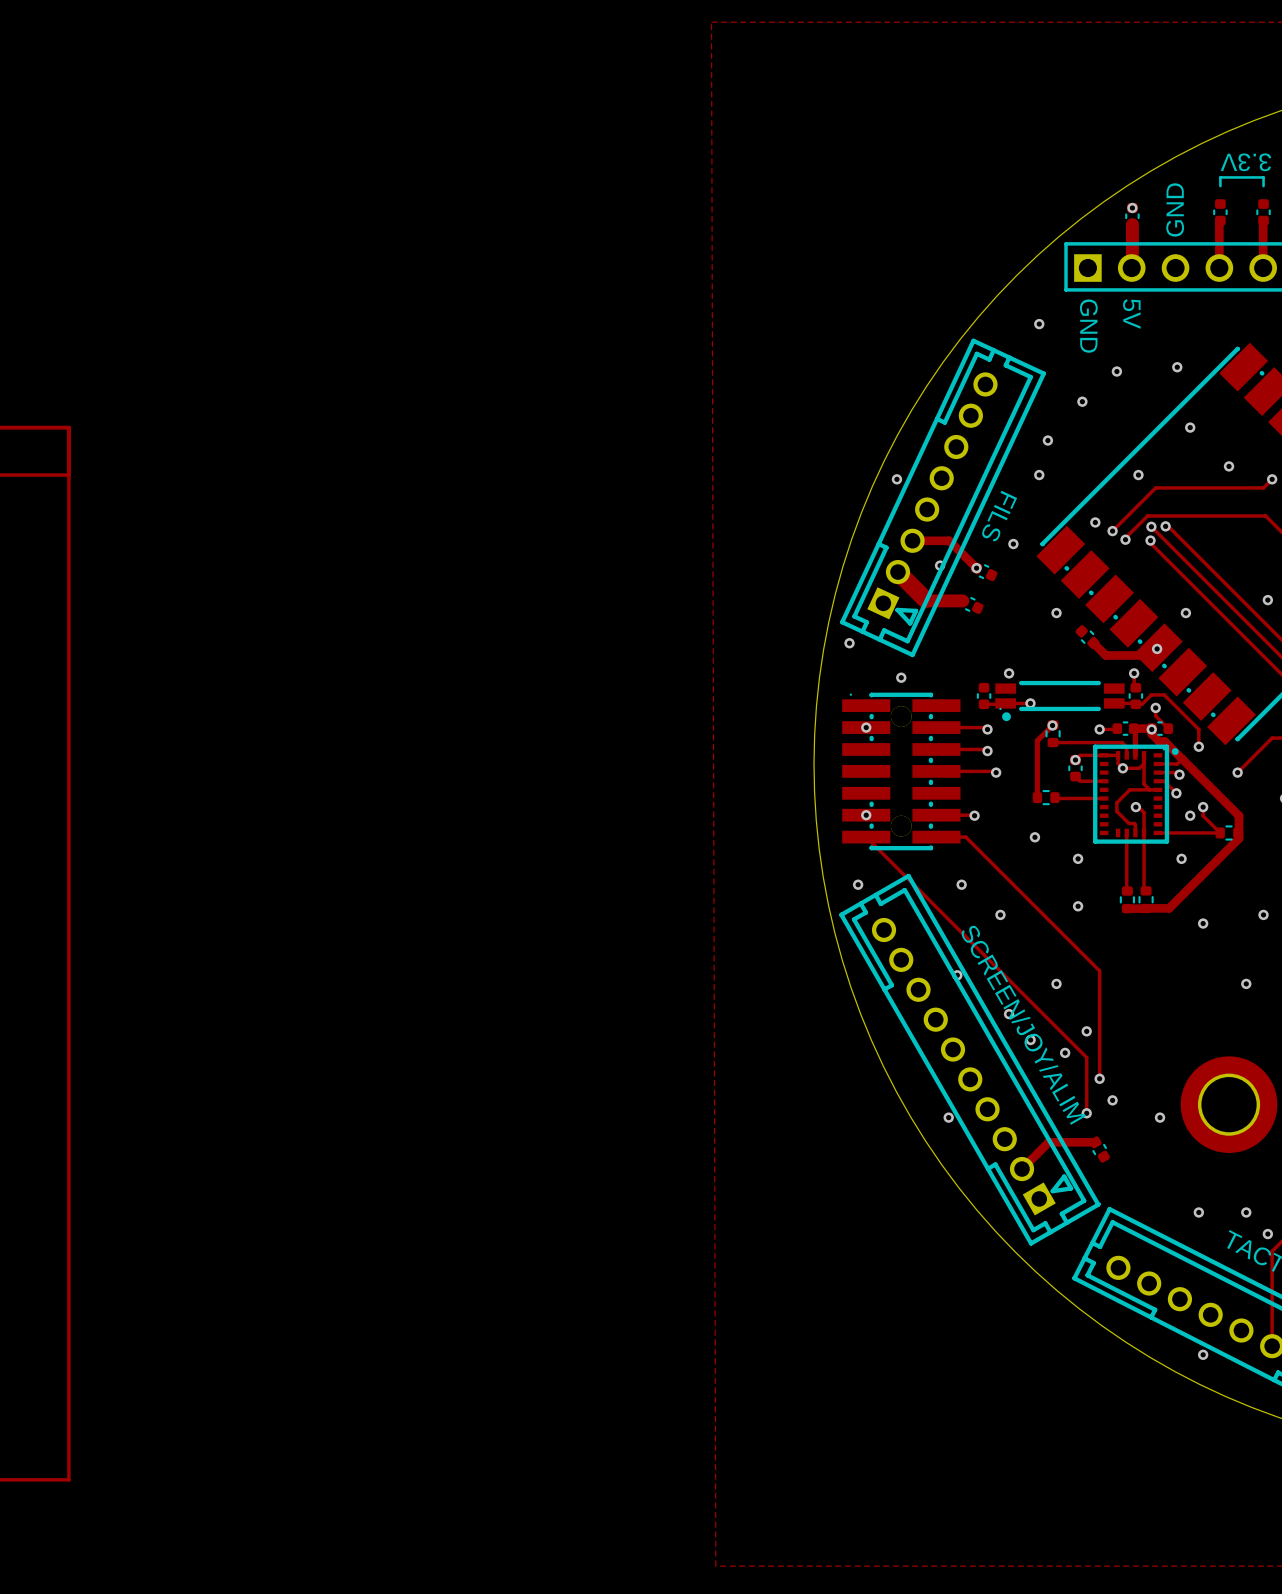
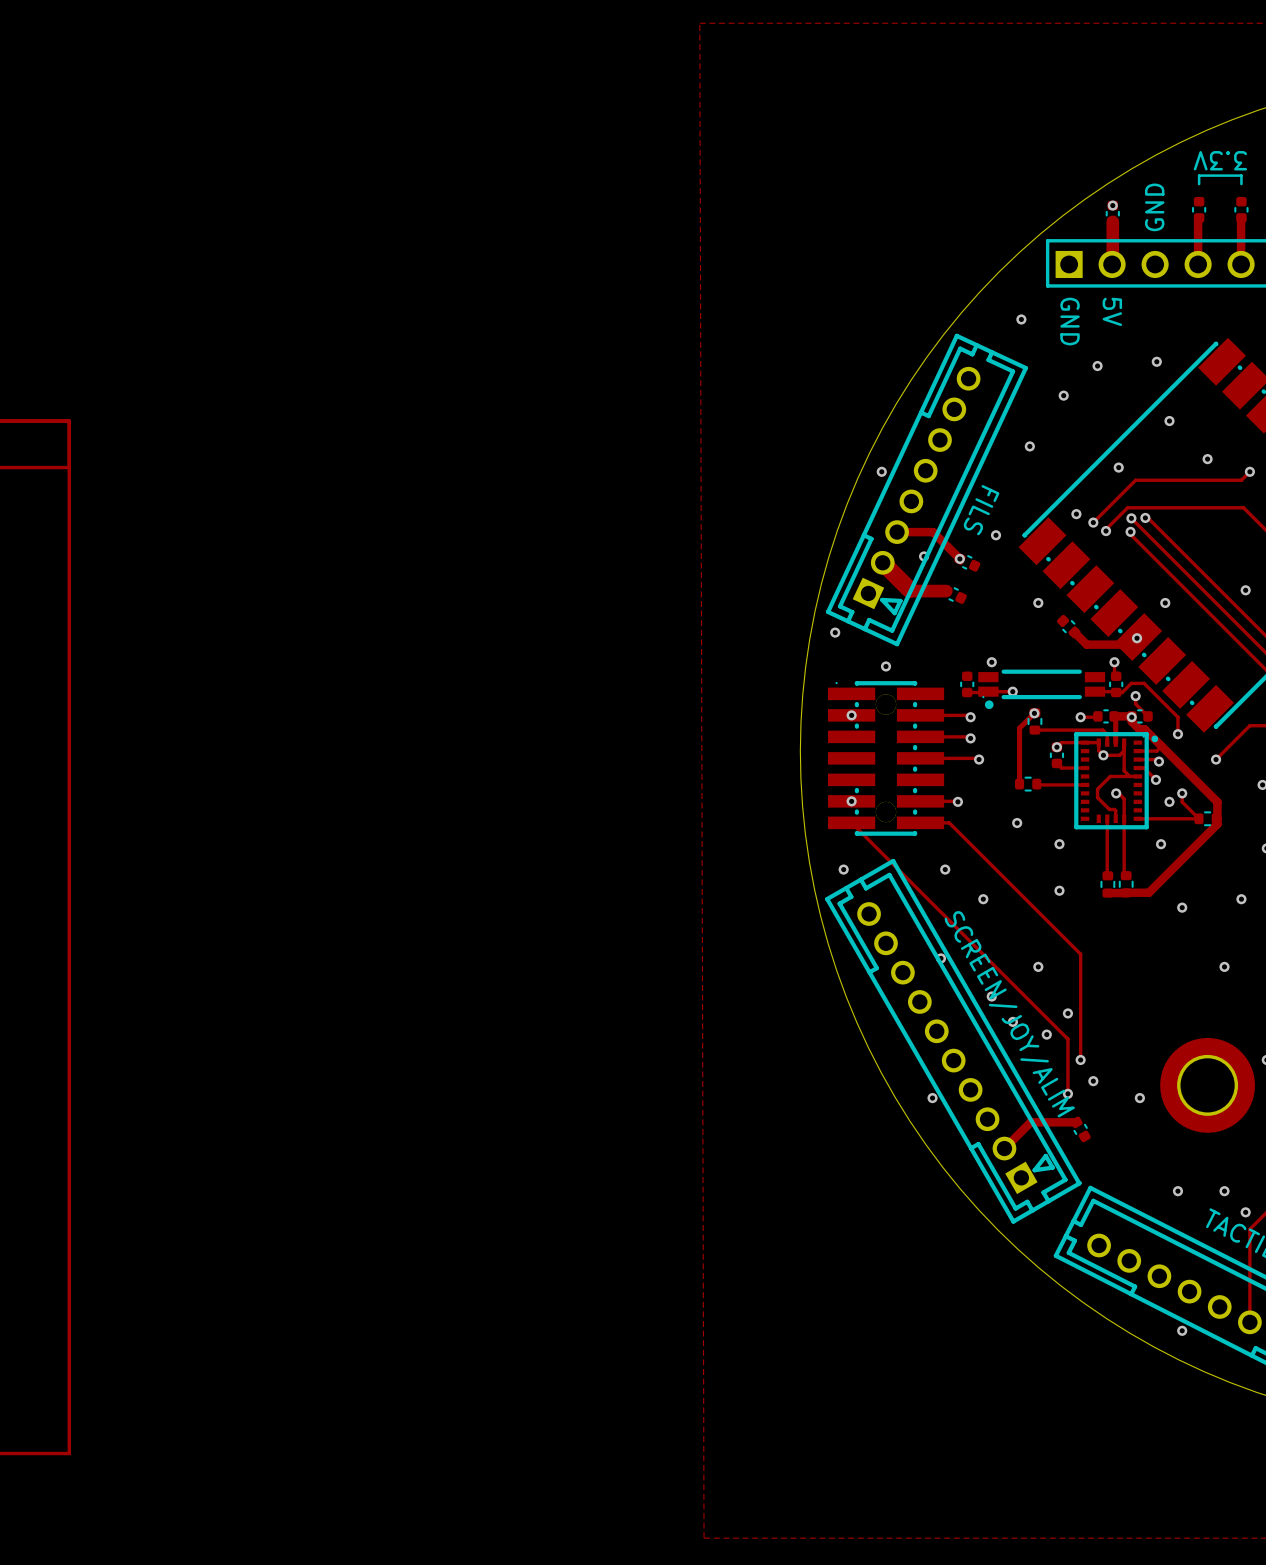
via: (1047, 440) -> none
via: none -> (1029, 446)
via: (1039, 475) -> none

